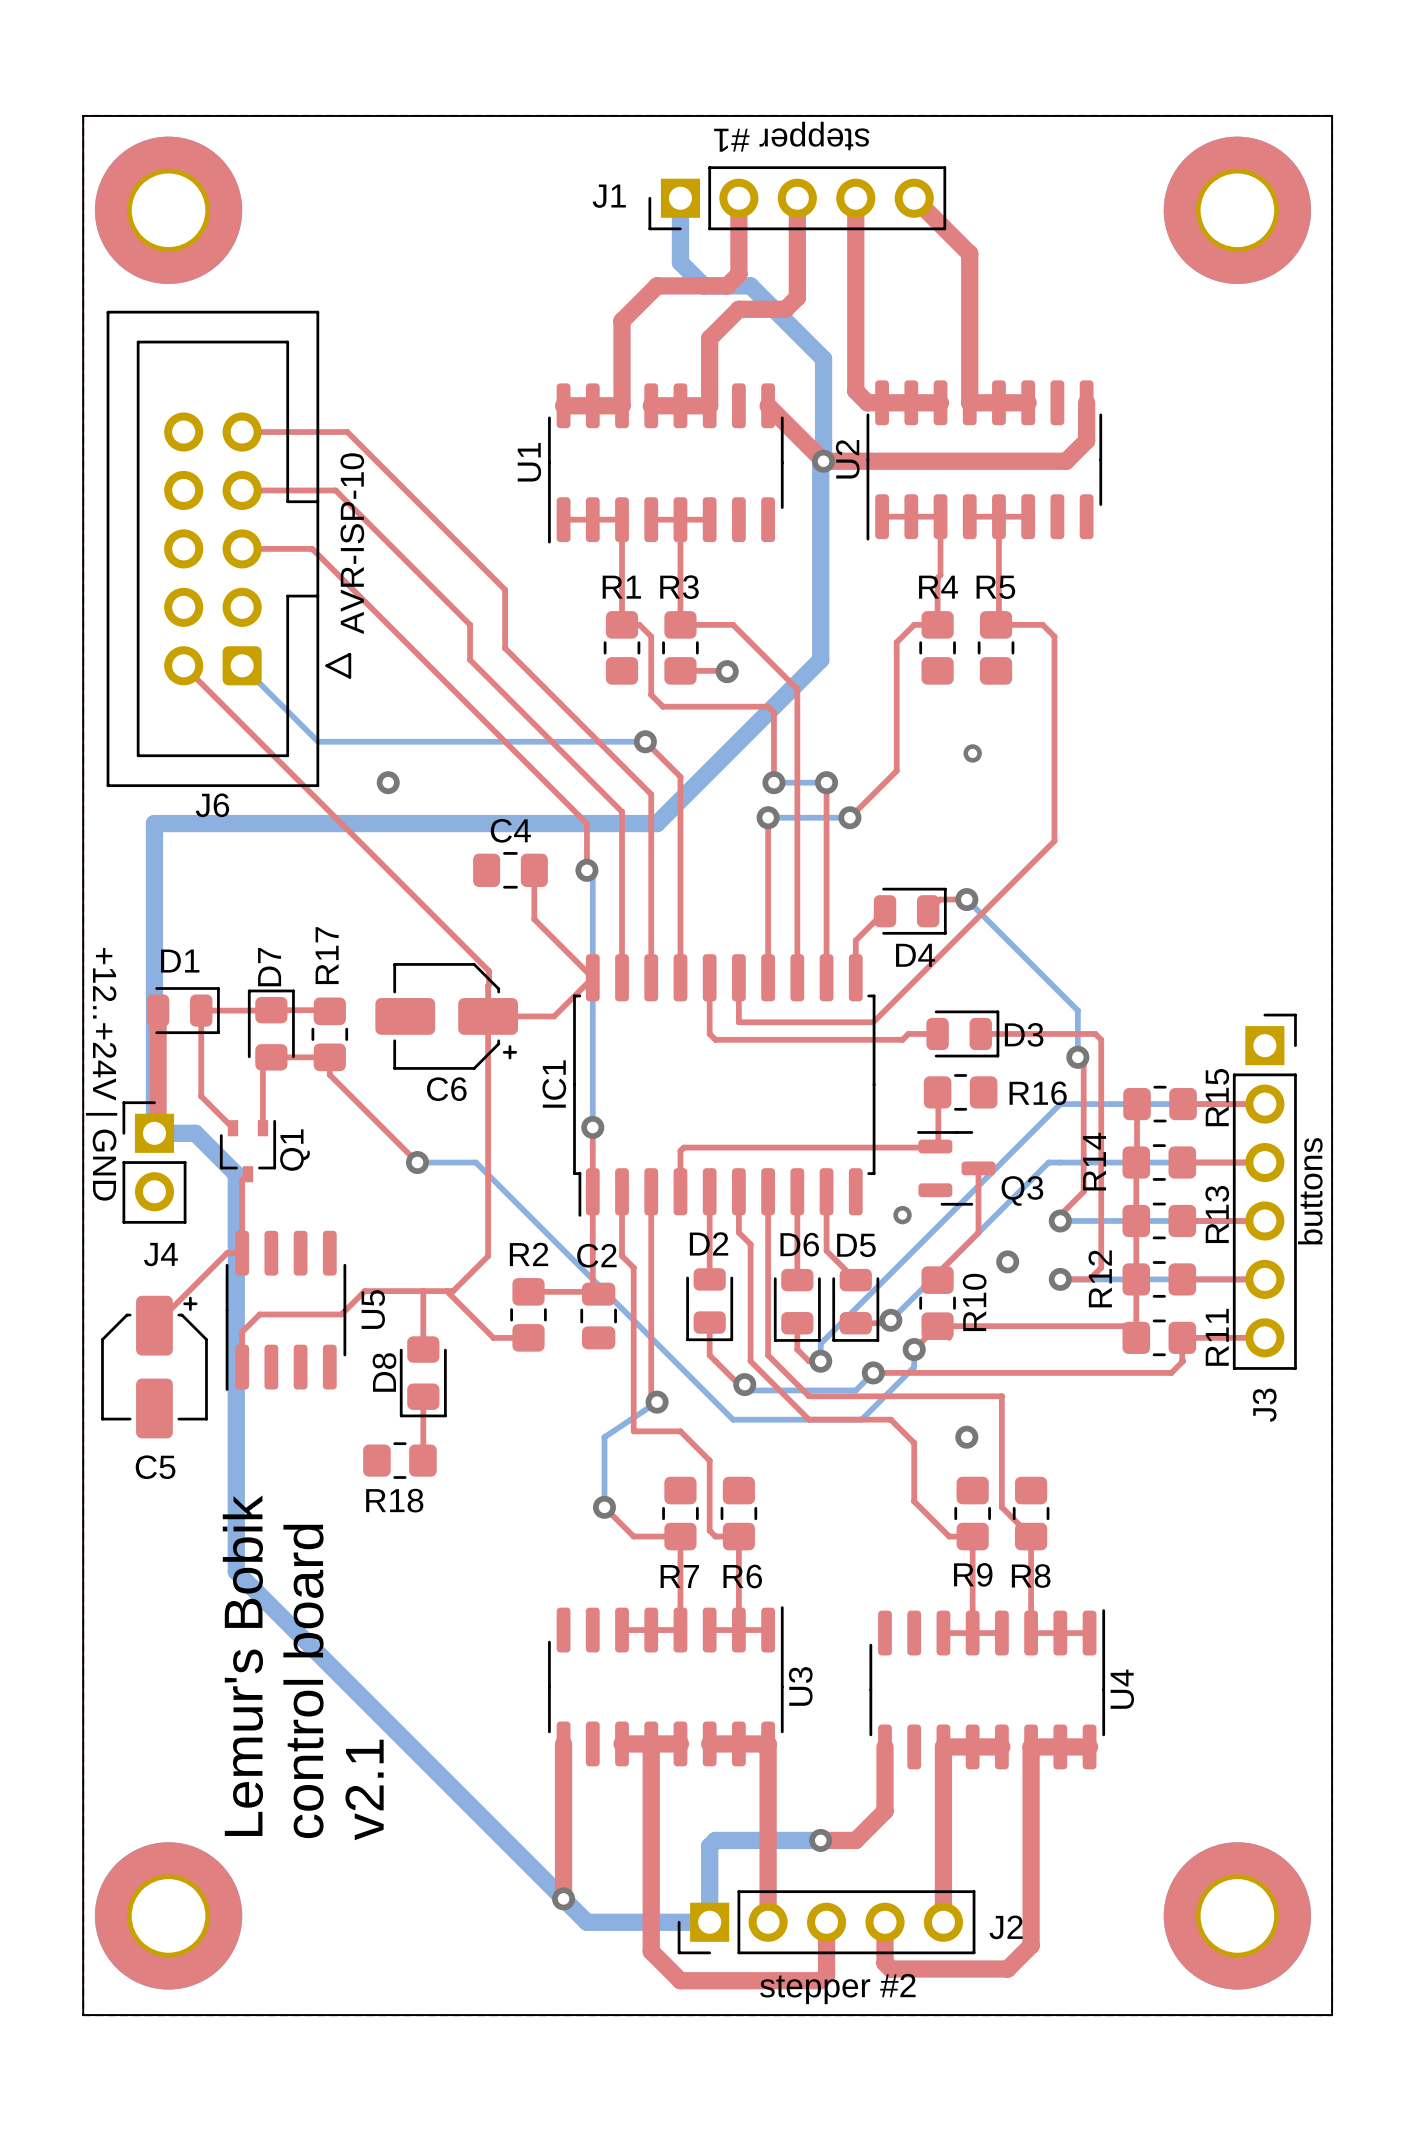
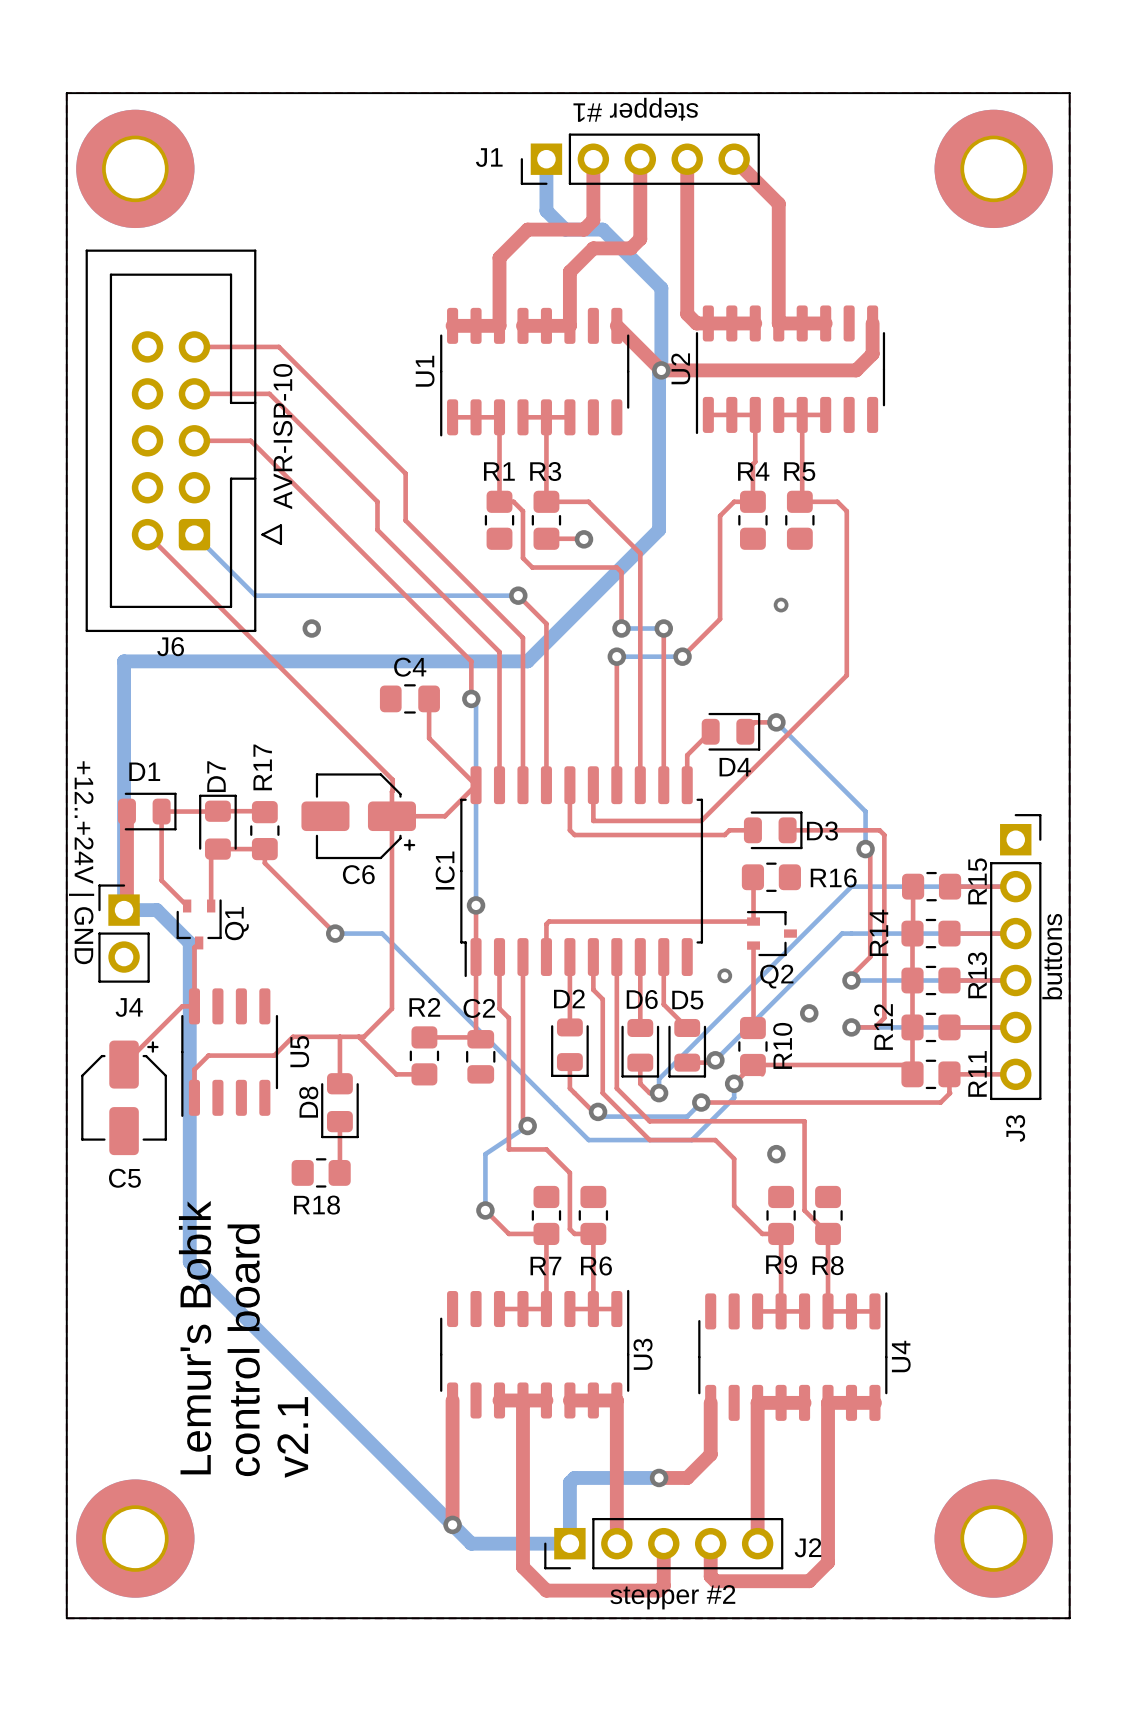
Q2: none -> (771, 933)
Q3: (956, 1168) -> none
top track: (978, 1168) (978, 1232) (937, 1273) (937, 1280) -> none
top track: none -> (753, 945) (753, 1027)

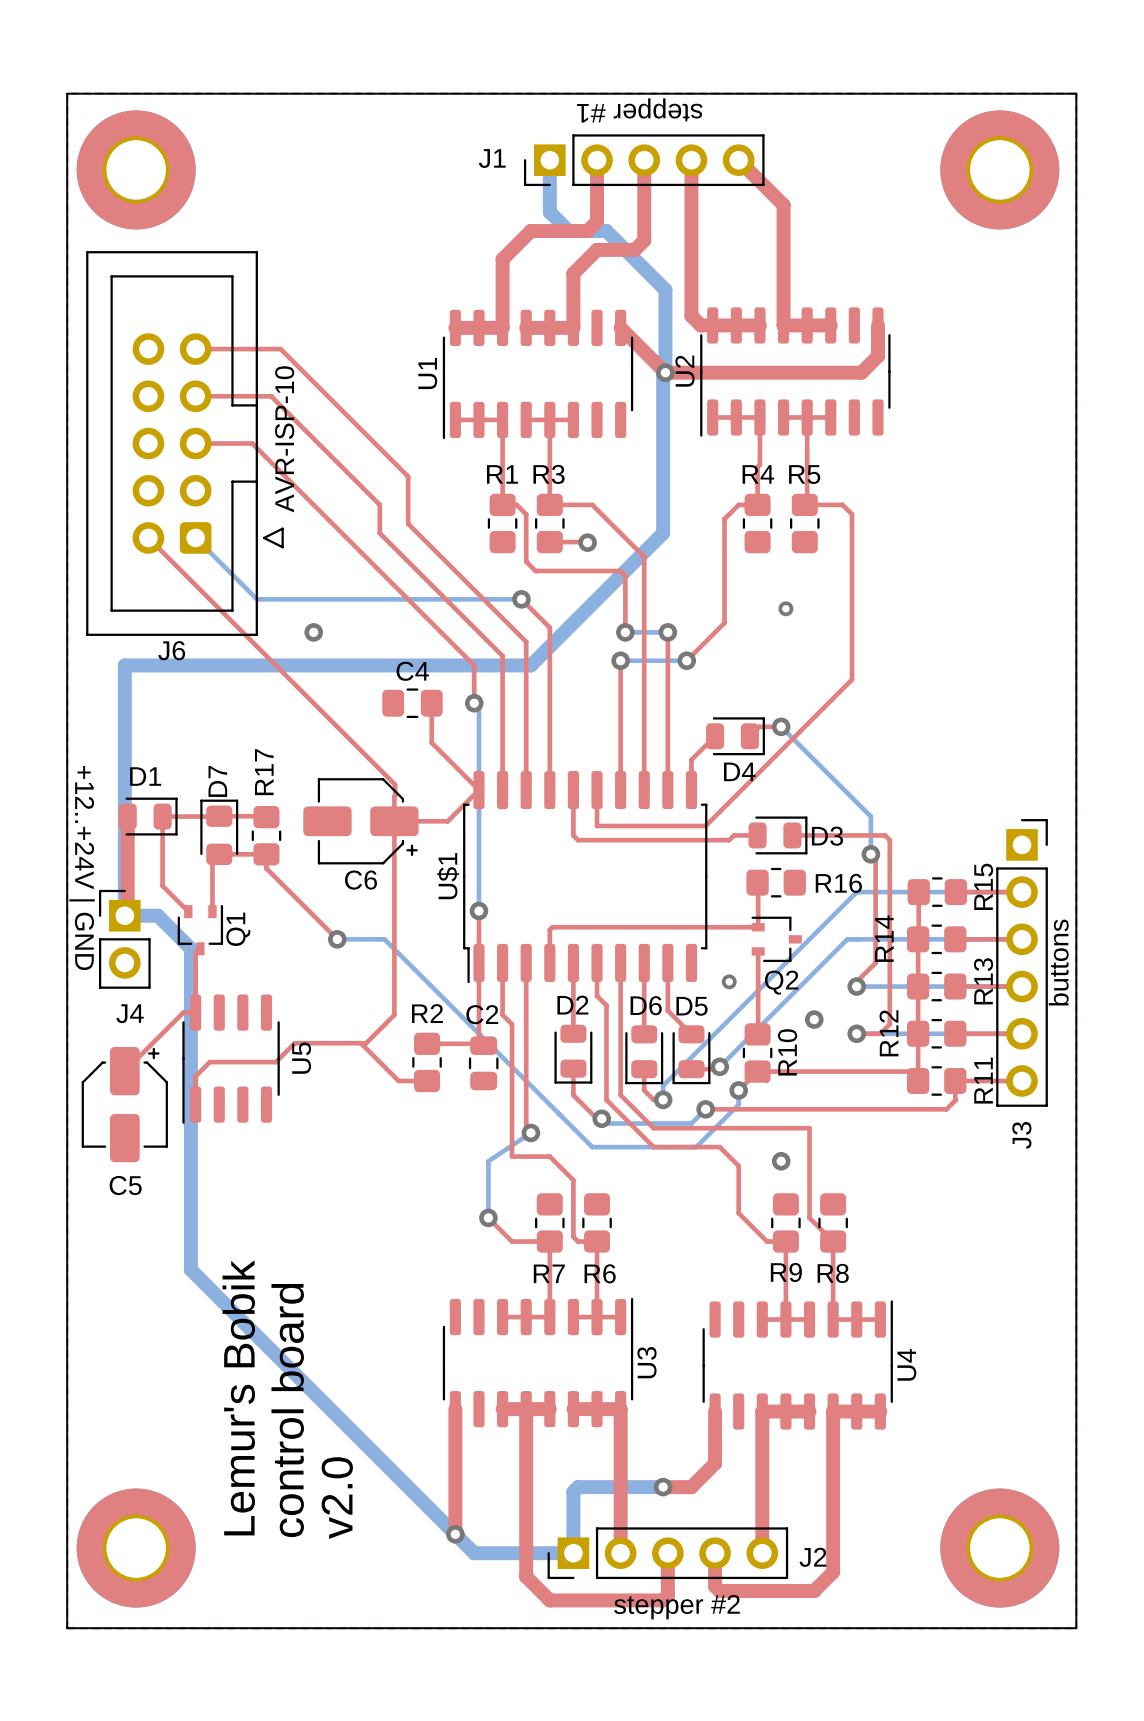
IC1 name: IC1 (445, 870) -> U$1 (448, 876)
top track: (339, 1036) (339, 1083) -> none
D8: (339, 1105) -> none
top track: (339, 1121) (339, 1172) -> none
R18: (321, 1172) -> none
text position: Lemur's Bobik (195, 1337) -> Lemur's Bobik (238, 1397)
text position: control board (243, 1350) -> control board (287, 1410)
text: v2.1 (292, 1437) -> v2.0 (337, 1498)

